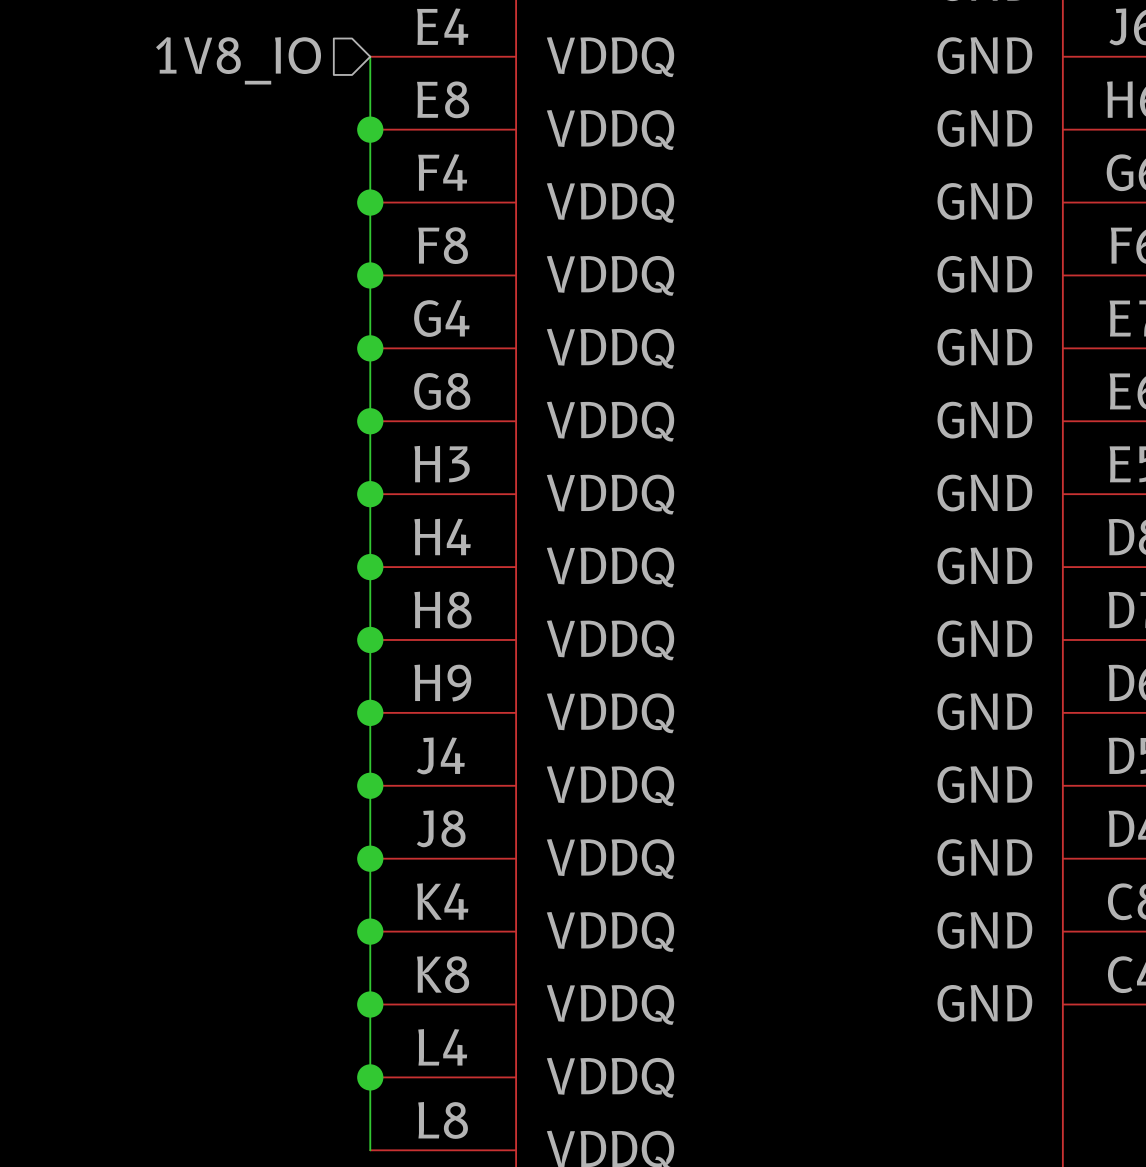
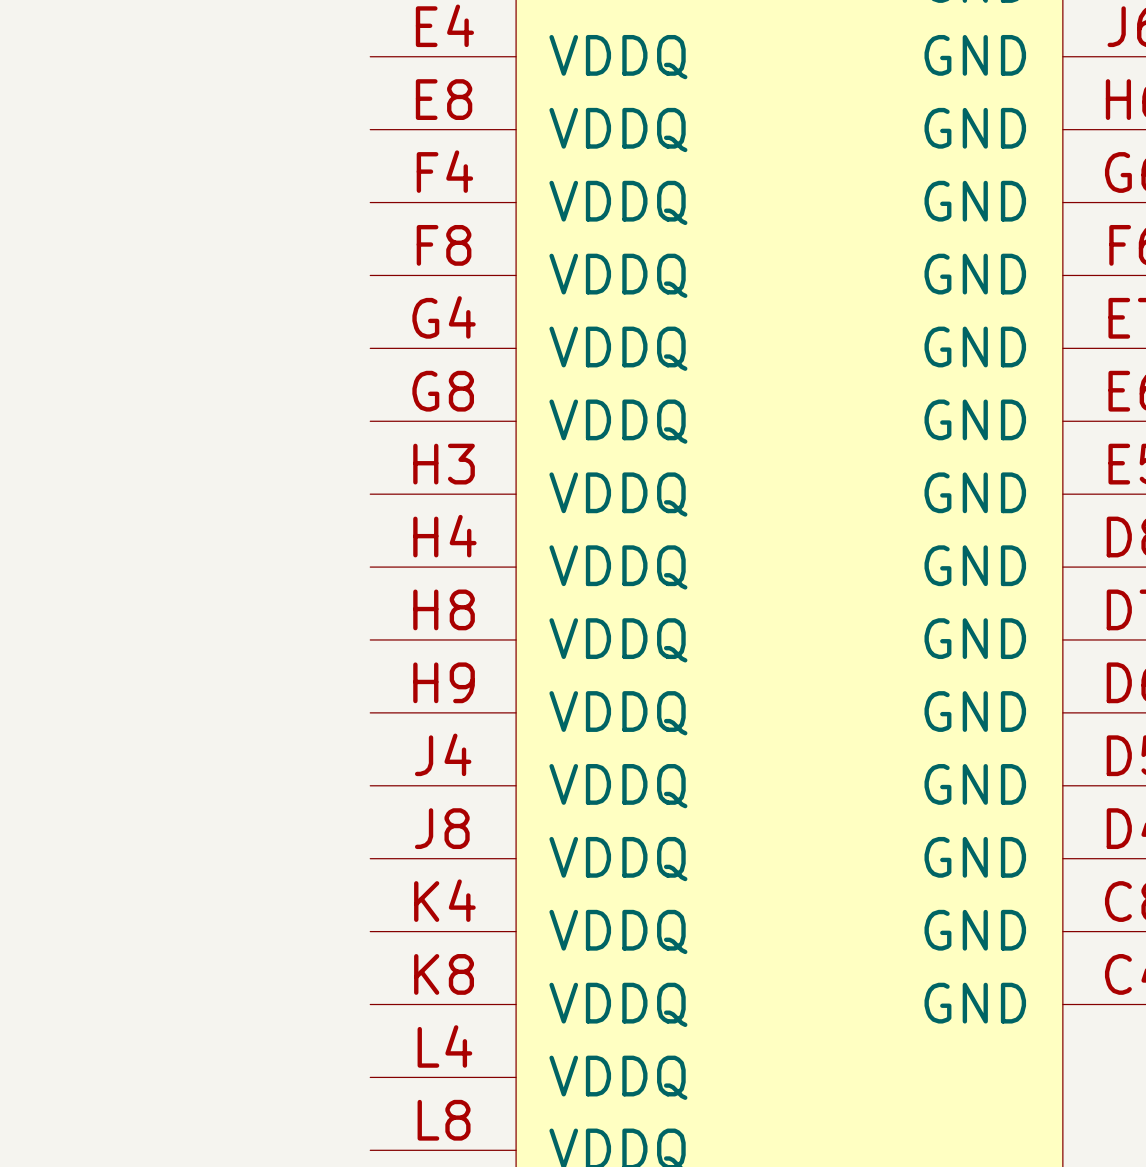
wire: (370, 56) (370, 1150) -> none
hierarchical label: 1V8_IO (238, 60) -> none
junction: (370, 129) -> none
junction: (370, 202) -> none
junction: (370, 275) -> none
junction: (370, 348) -> none
junction: (370, 421) -> none
junction: (370, 494) -> none
junction: (370, 567) -> none
junction: (370, 639) -> none
junction: (370, 712) -> none
junction: (370, 785) -> none
junction: (370, 858) -> none
junction: (370, 931) -> none
junction: (370, 1004) -> none
junction: (370, 1077) -> none

